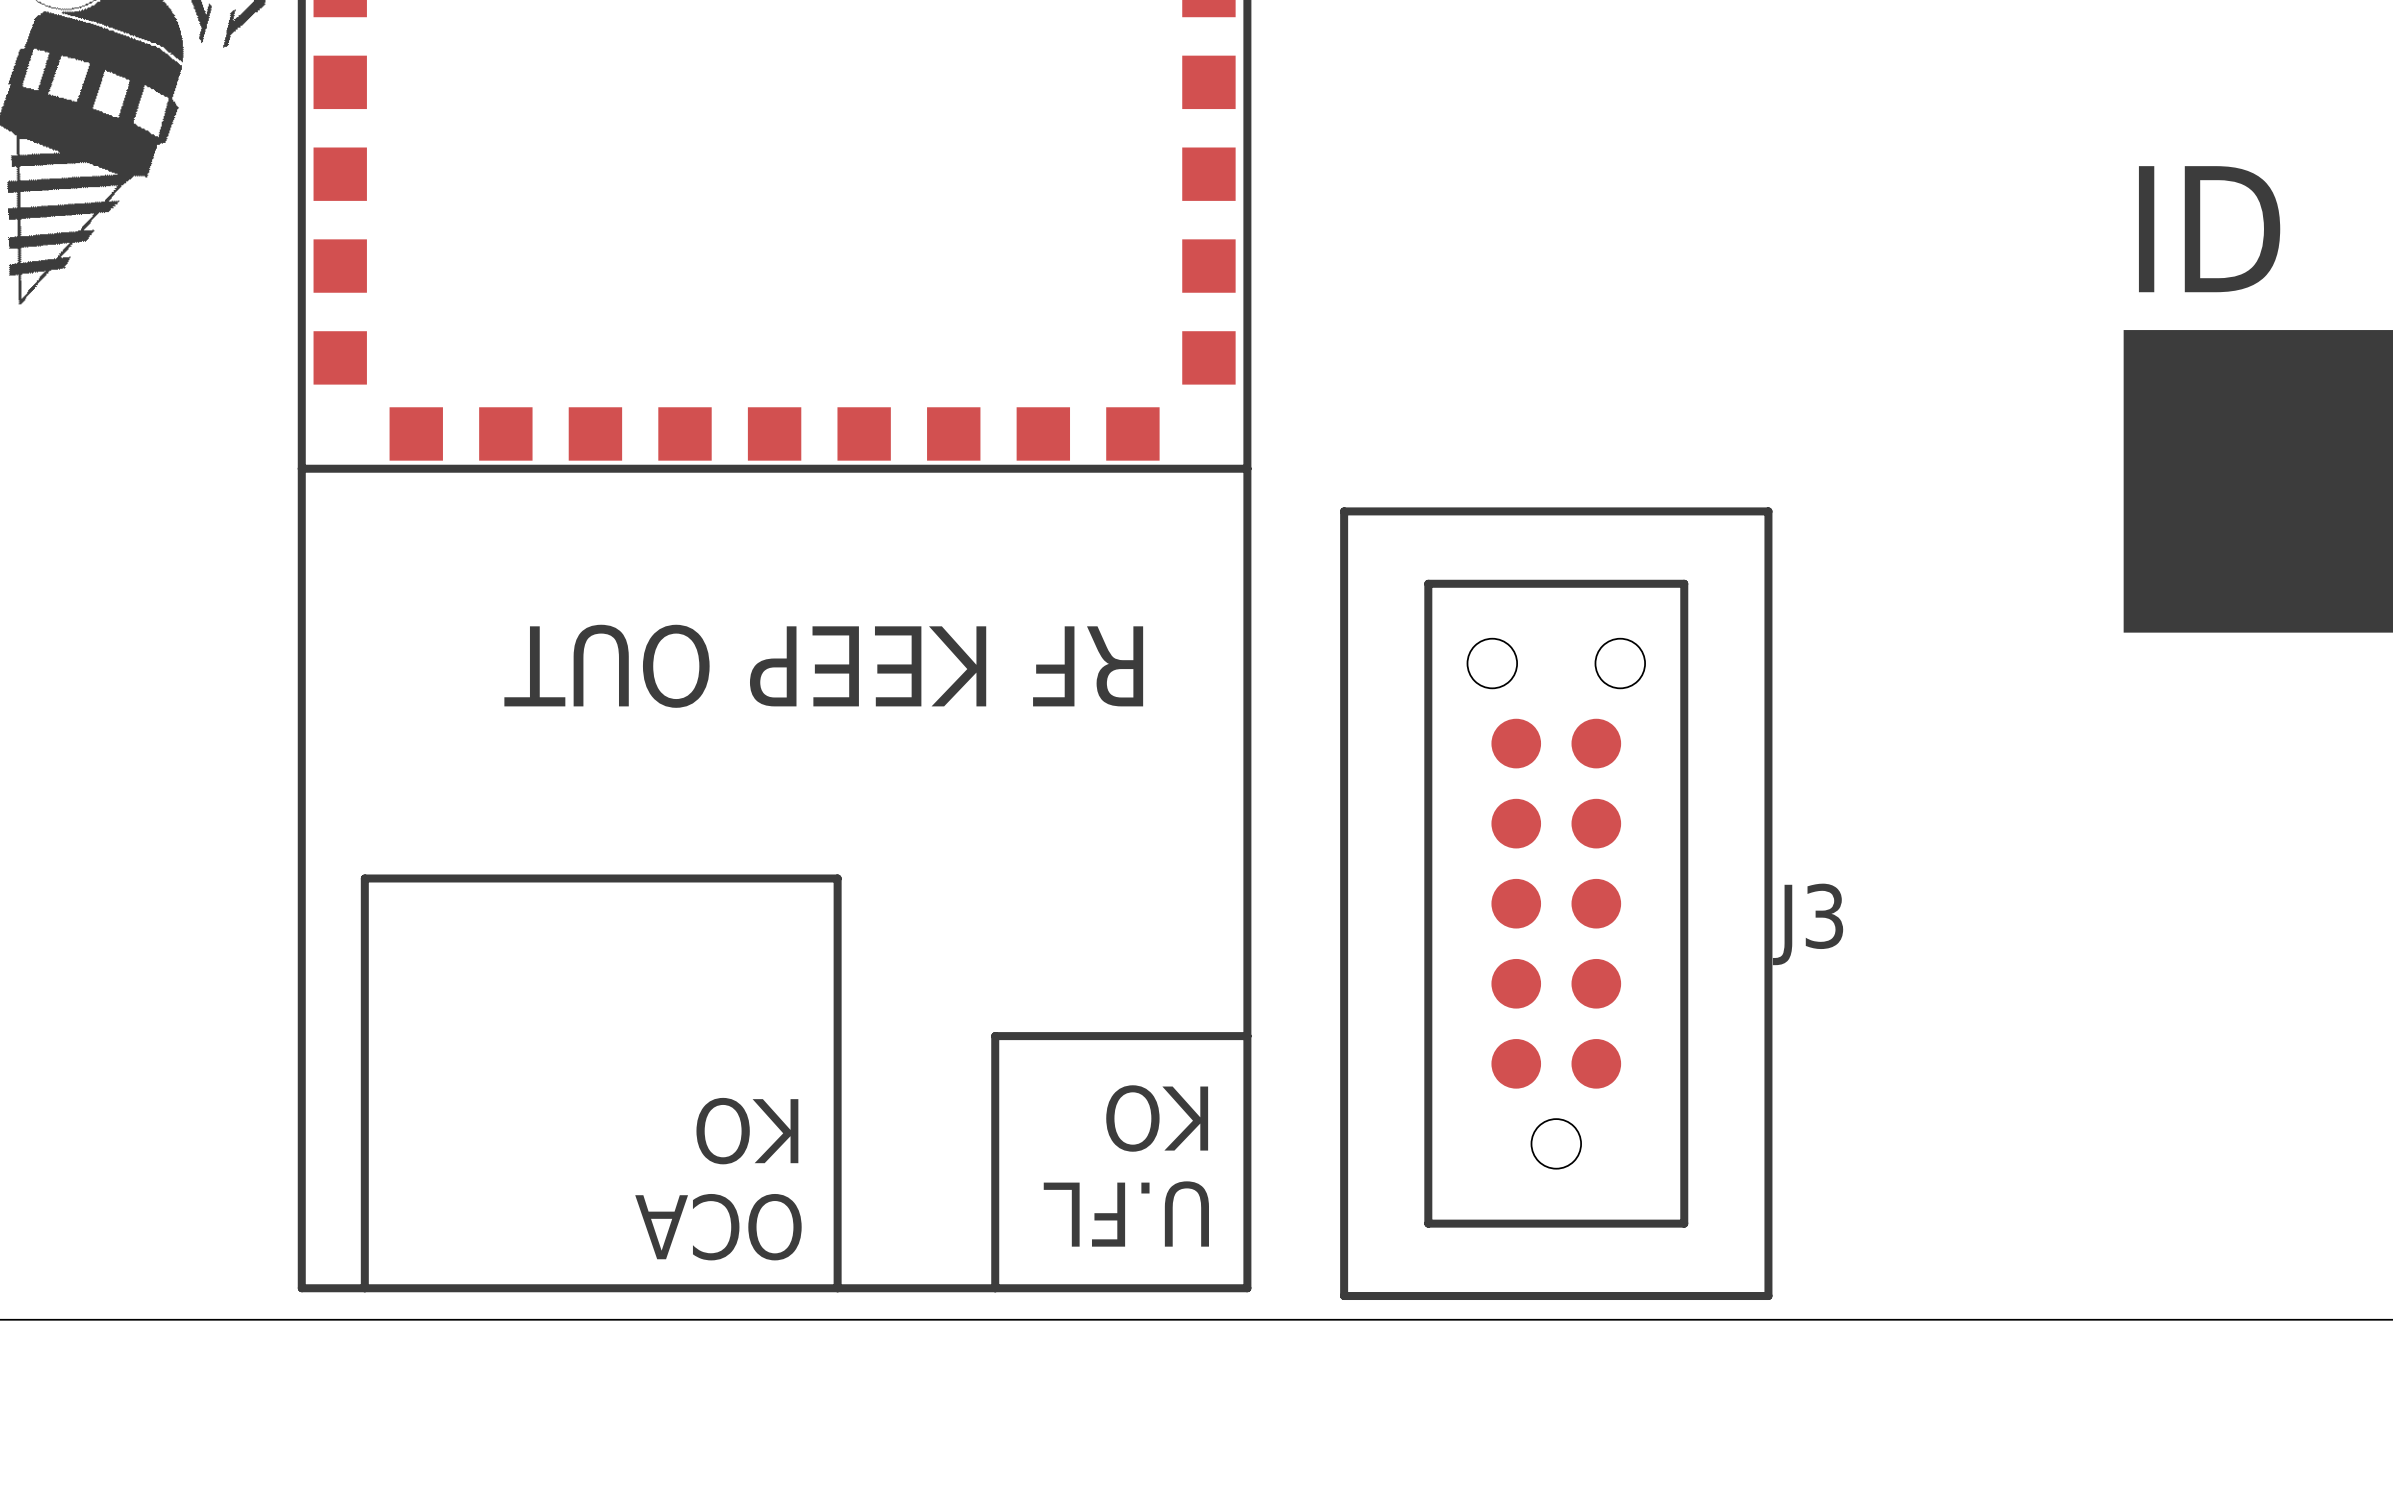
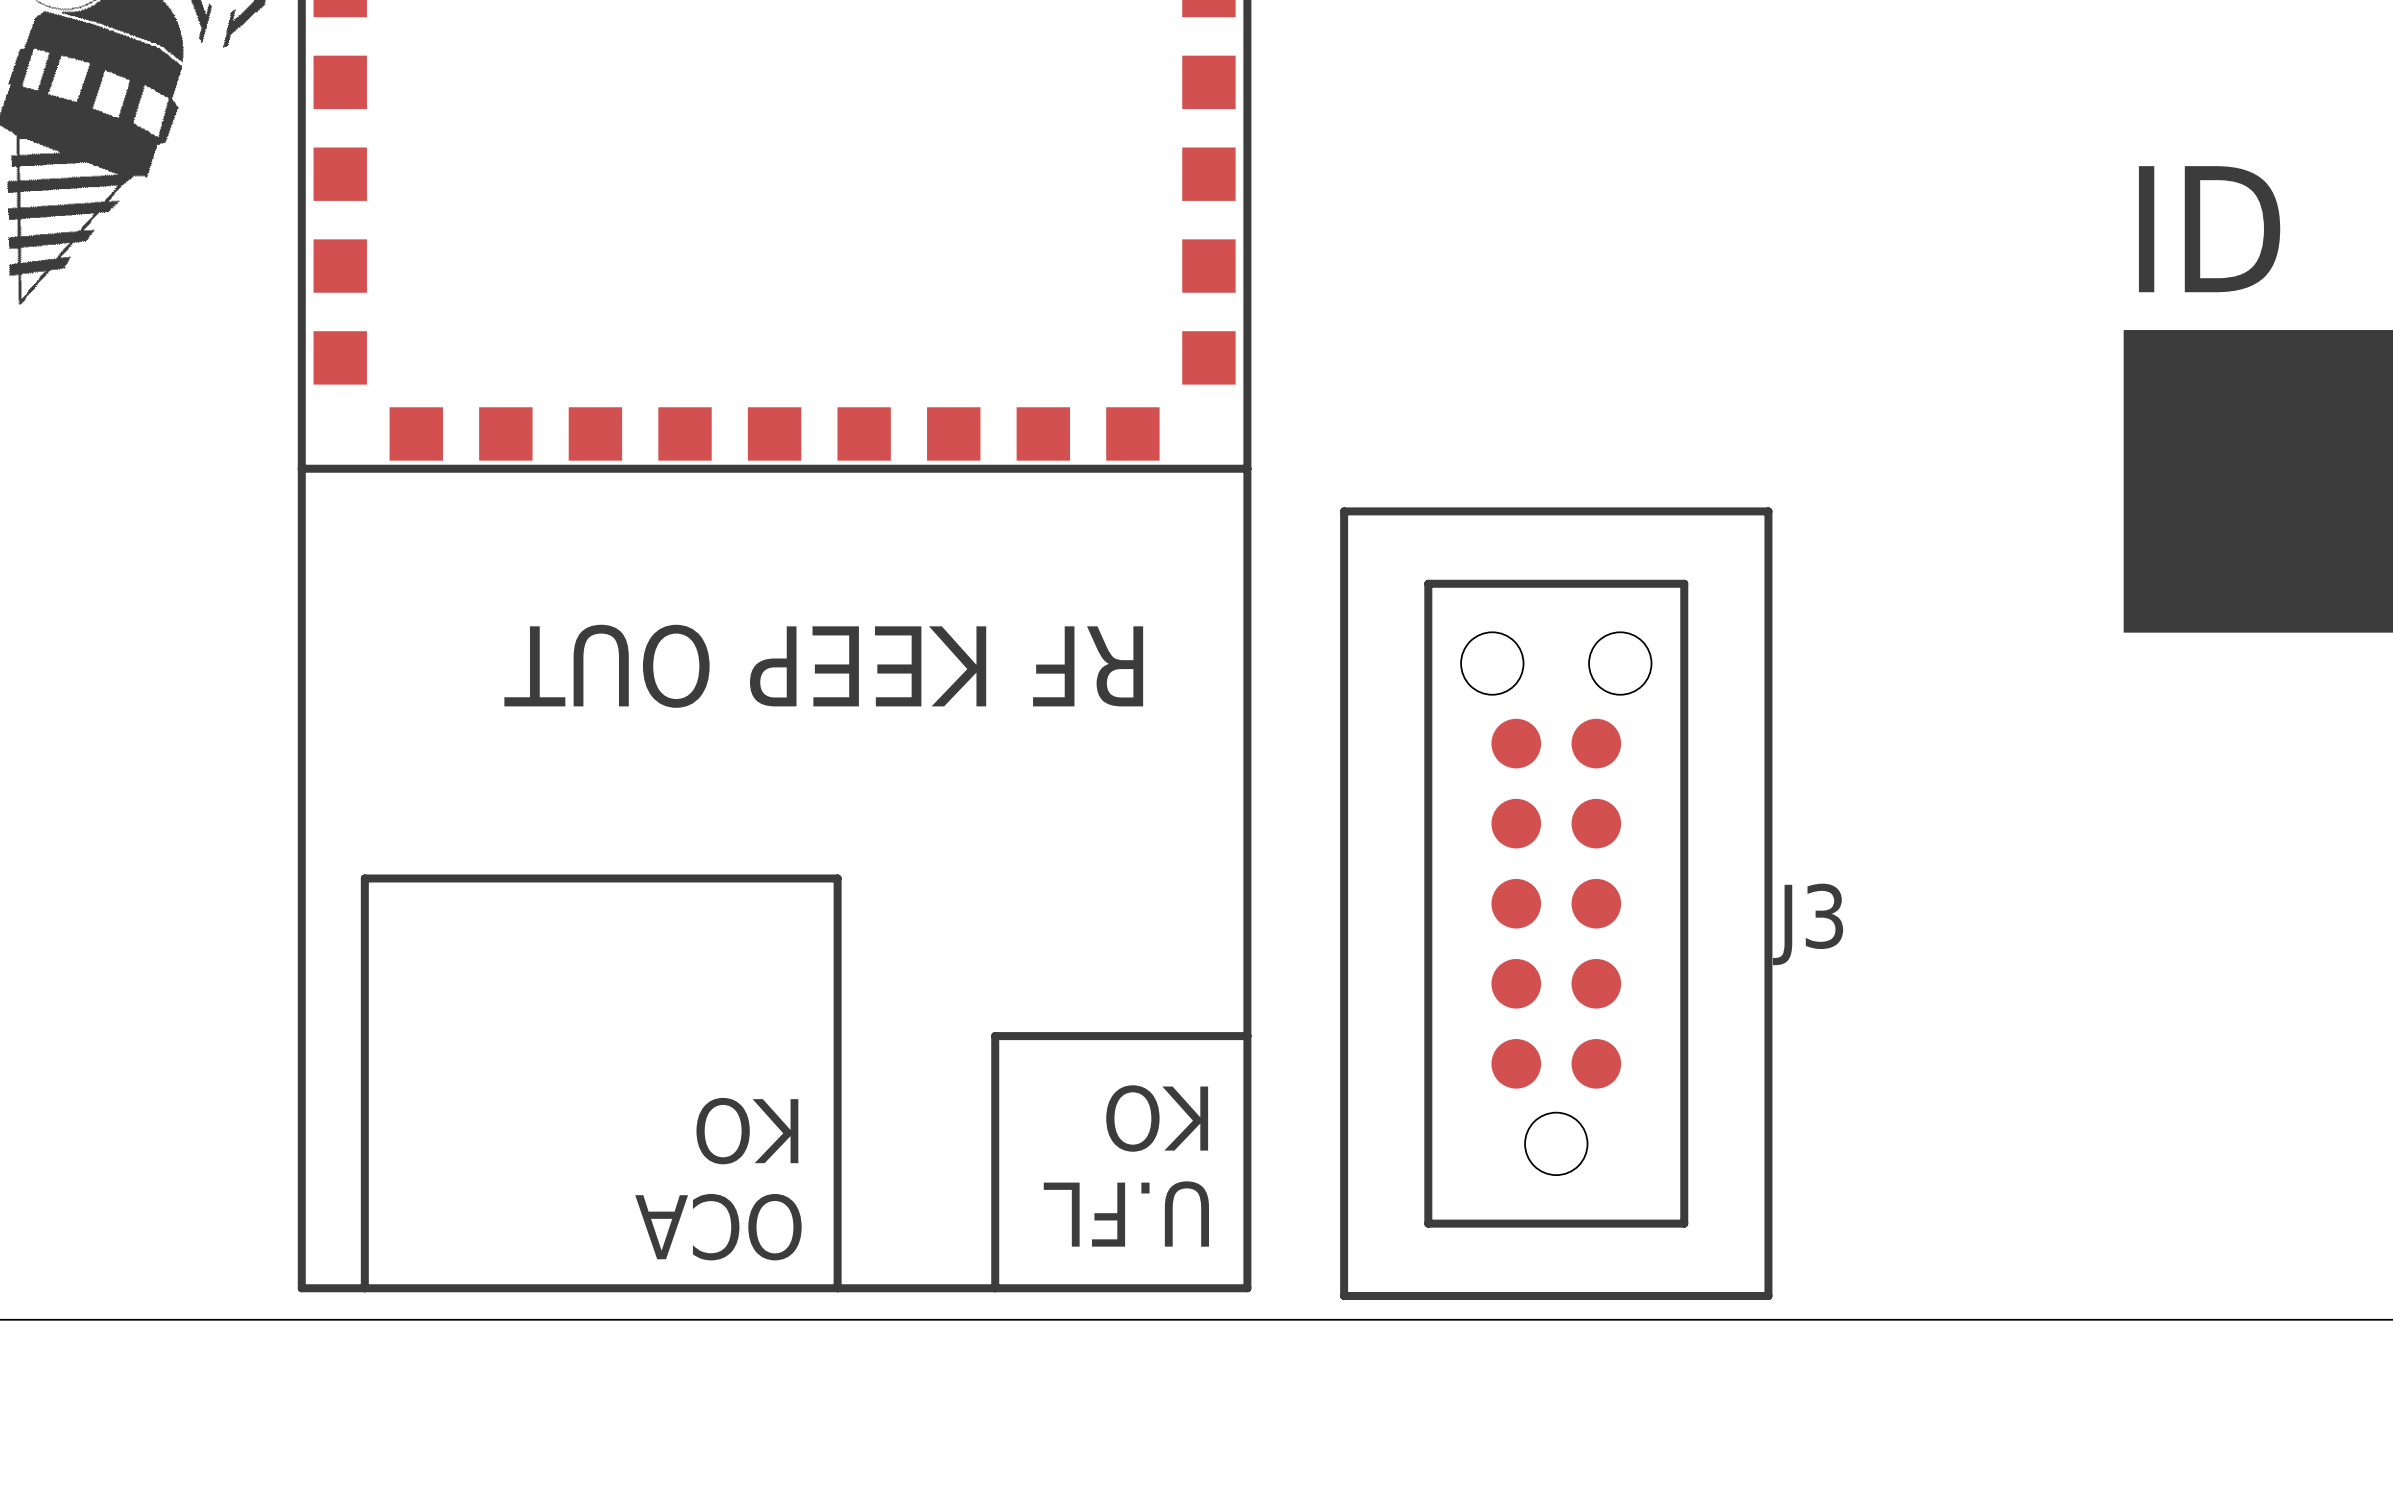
part footprint: [1340, 507, 1773, 1301] -> [1340, 507, 1773, 1301]

